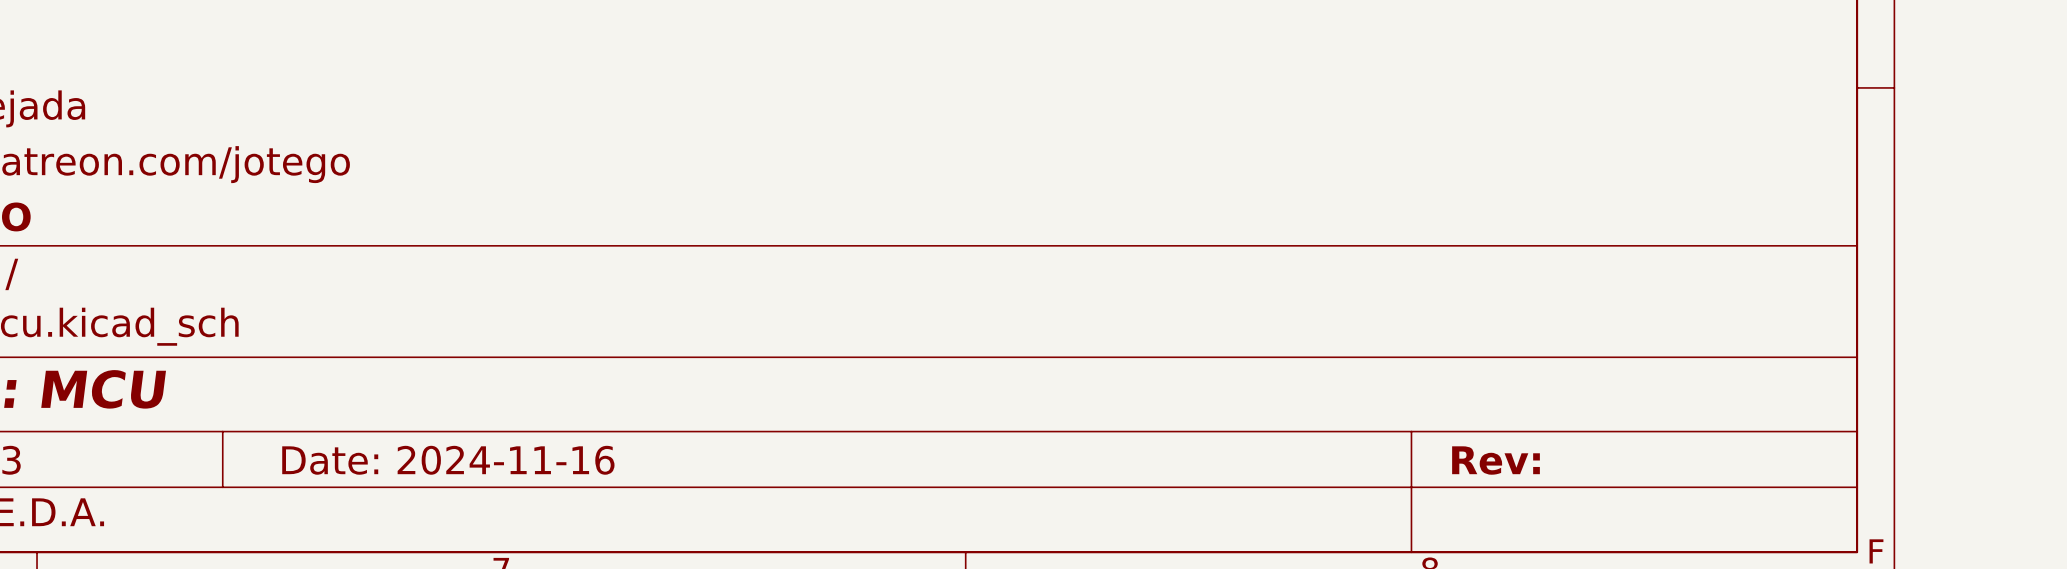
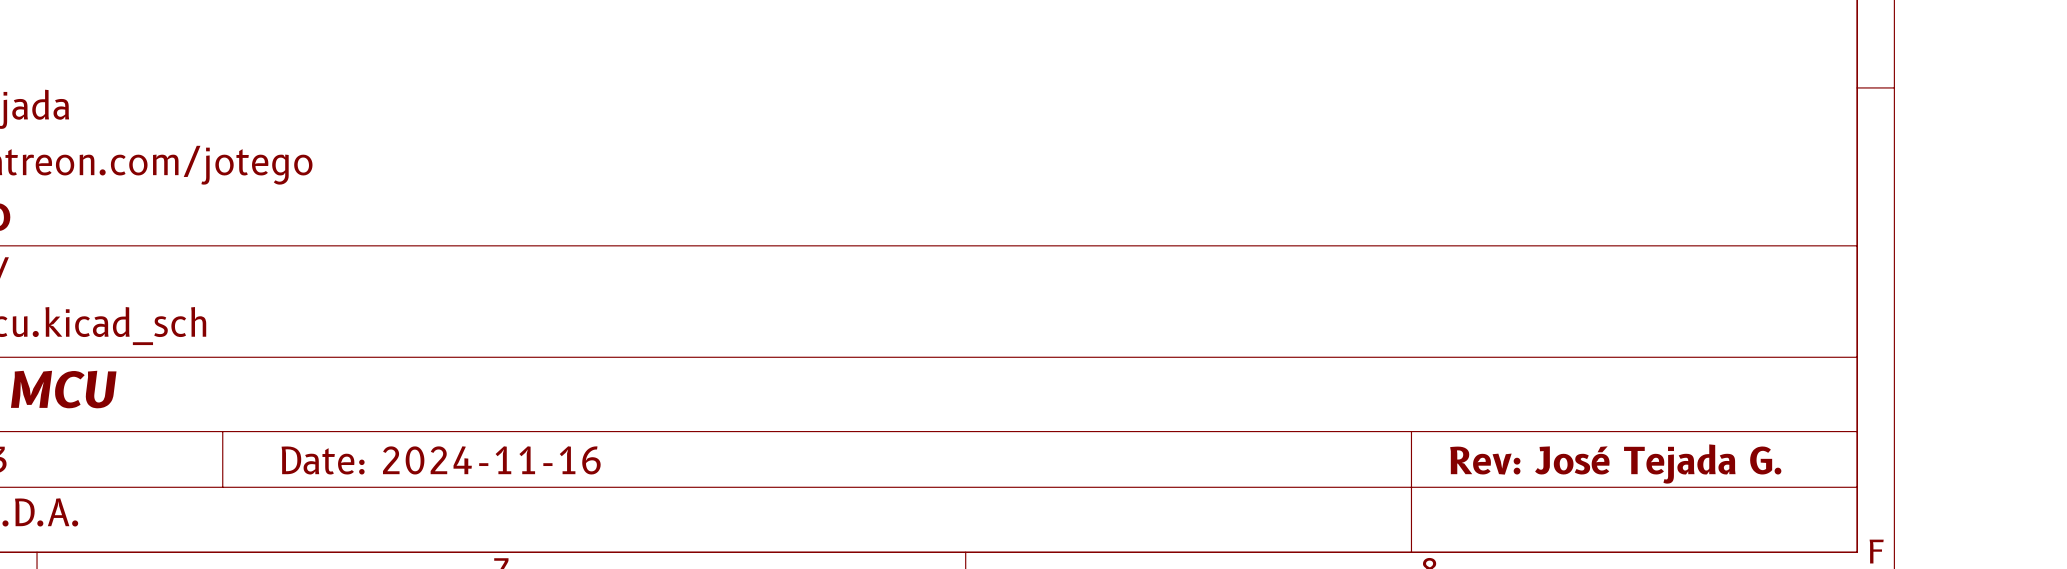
title block: Rev: (1496, 460) -> Rev: José Tejada G. (1615, 464)

